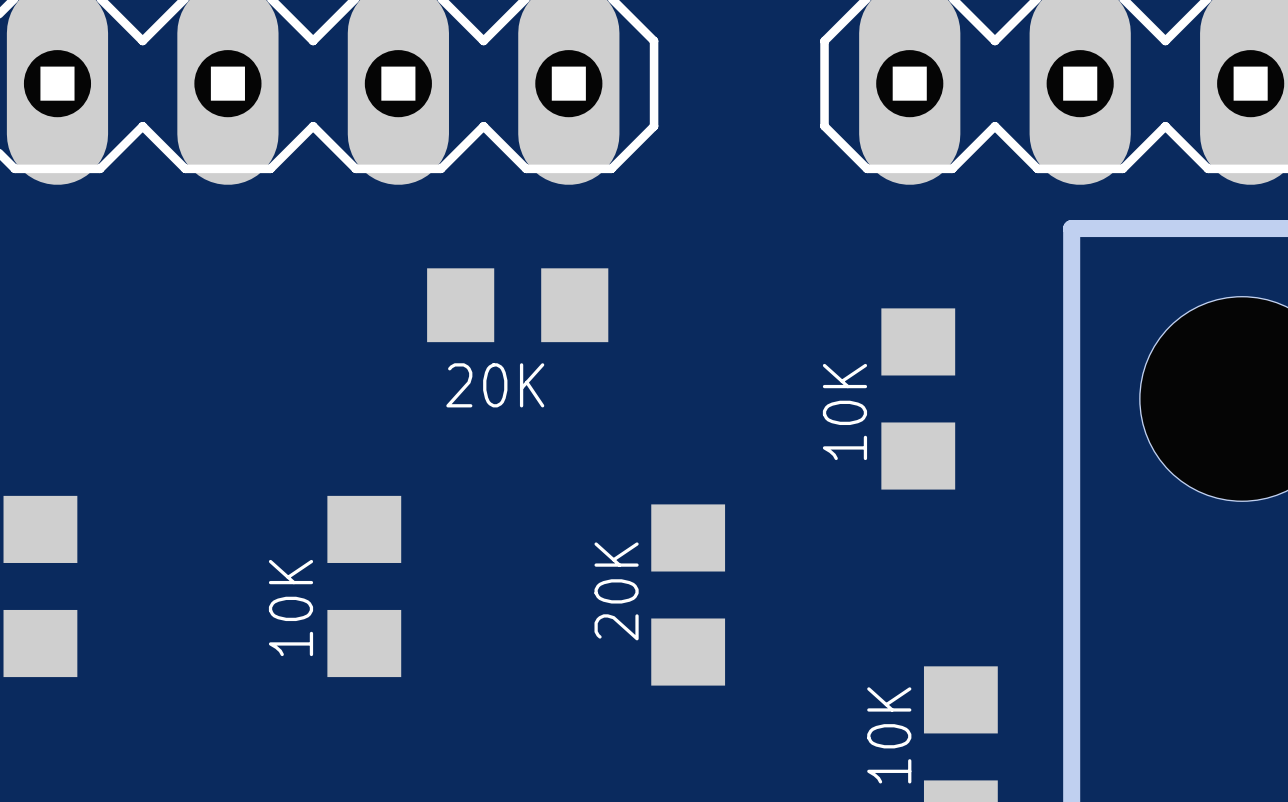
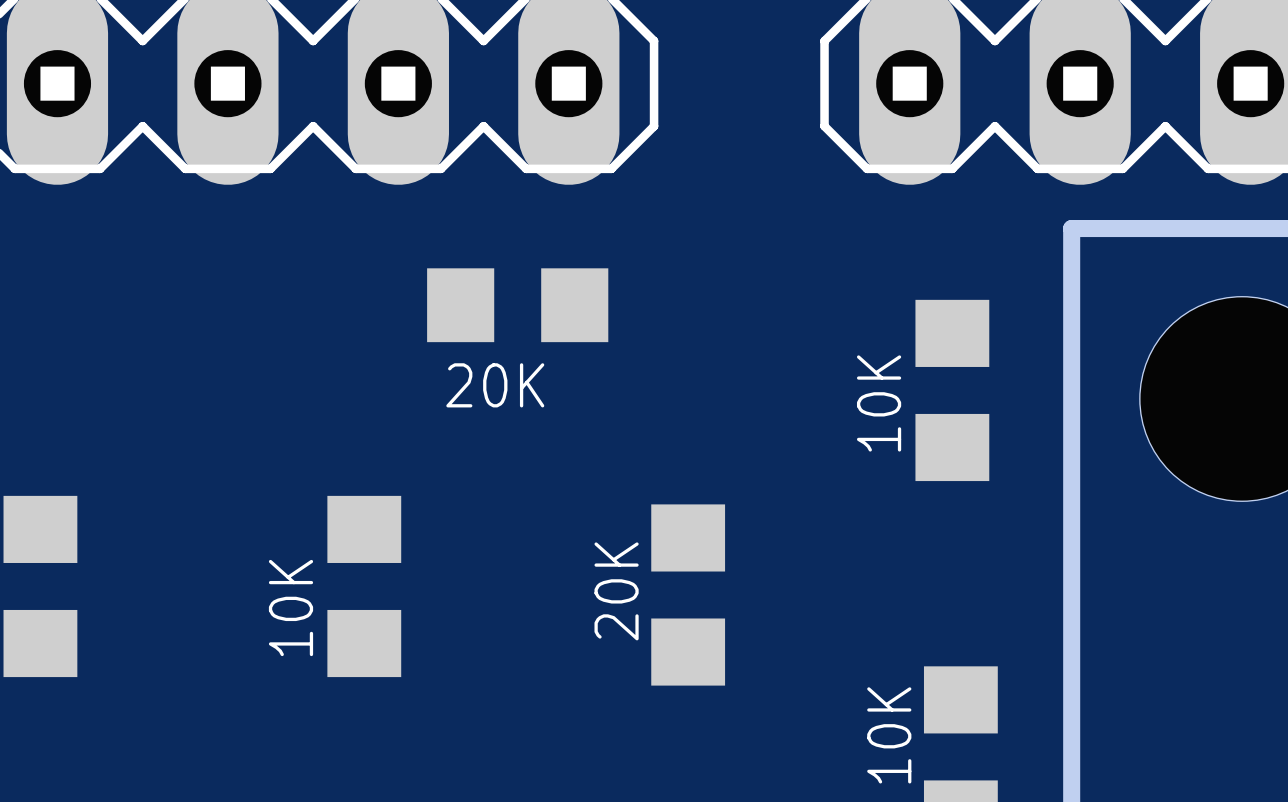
part position: (918, 398) -> (952, 390)

